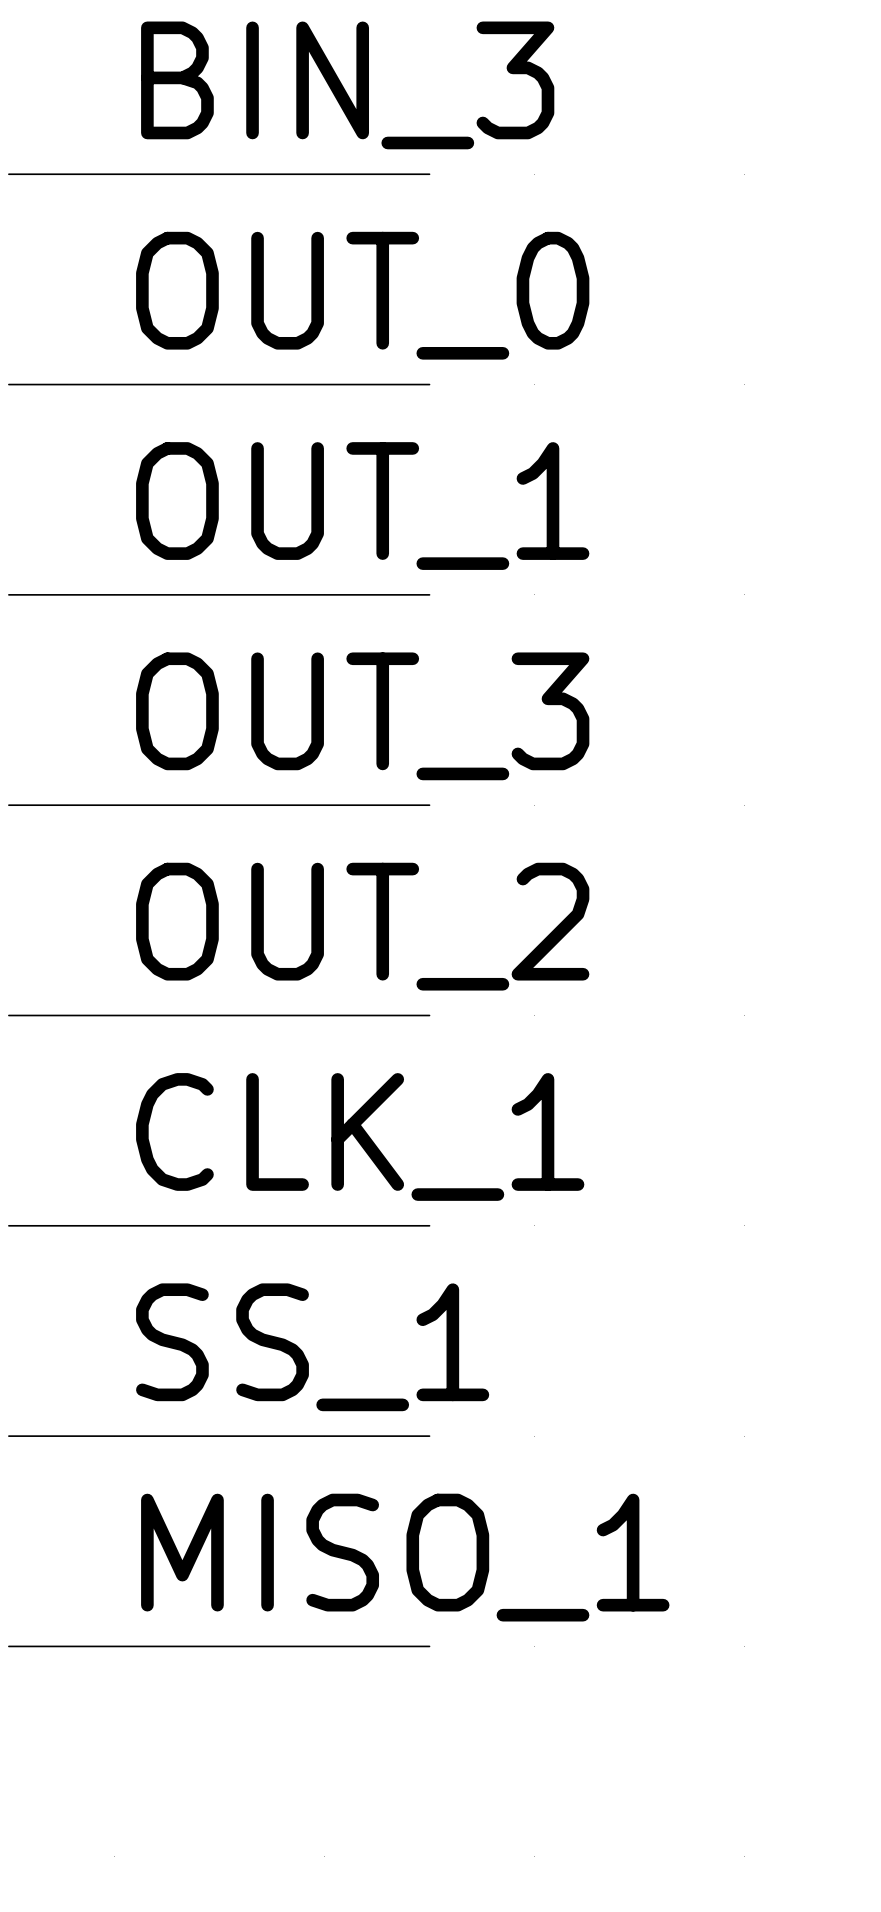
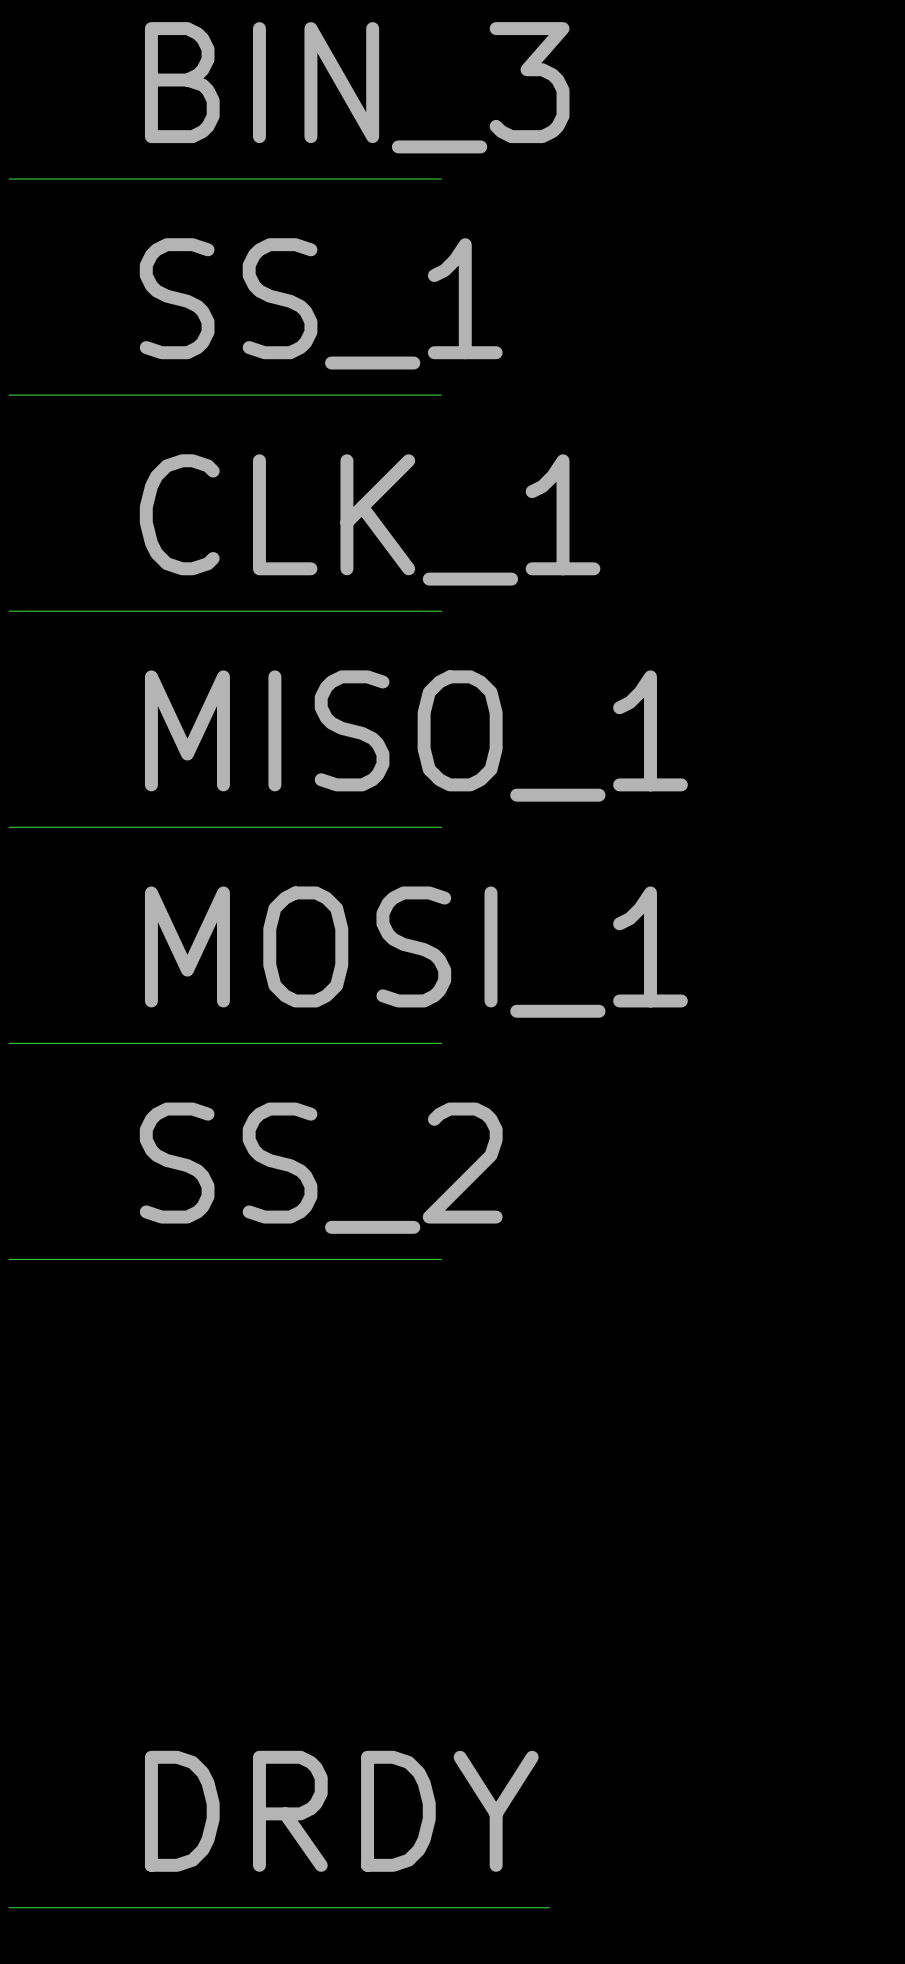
label: OUT_0 (362, 295) -> SS_1 (321, 303)
label: OUT_1 (362, 506) -> CLK_1 (370, 519)
label: OUT_3 (362, 716) -> MISO_1 (416, 736)
label: OUT_2 (362, 926) -> MOSI_1 (416, 952)
label: CLK_1 (360, 1136) -> SS_2 (321, 1168)
label: SS_1 (312, 1347) -> none
wire: (8, 1436) (429, 1436) -> none
label: MISO_1 (405, 1557) -> none
wire: (8, 1646) (429, 1646) -> none
label: none -> DRDY (341, 1811)
wire: none -> (9, 1907) (549, 1907)

